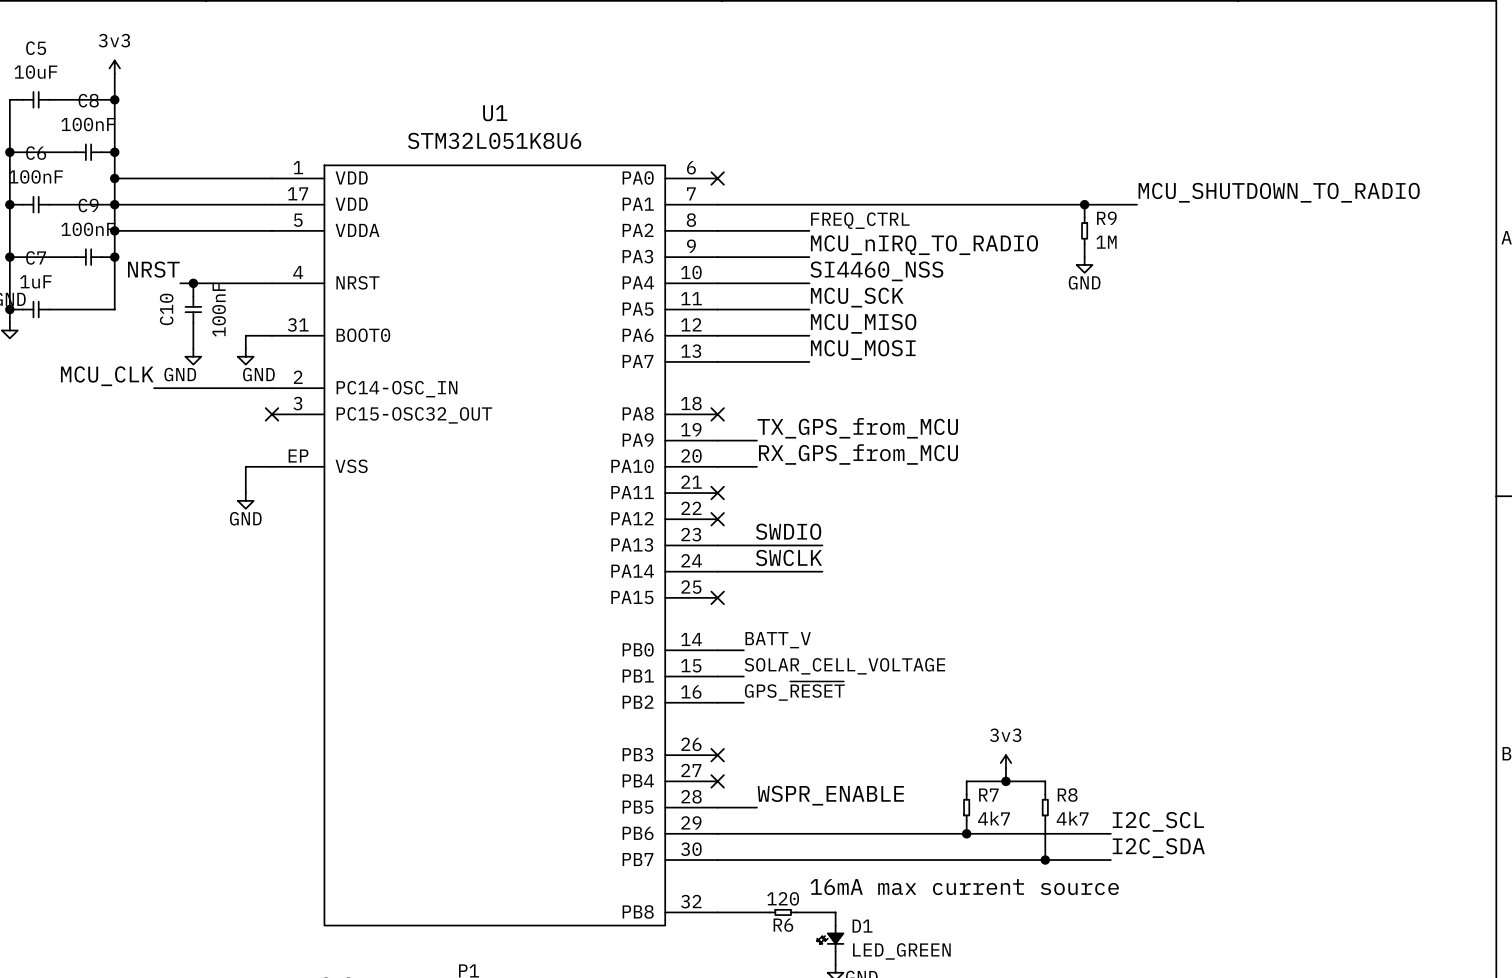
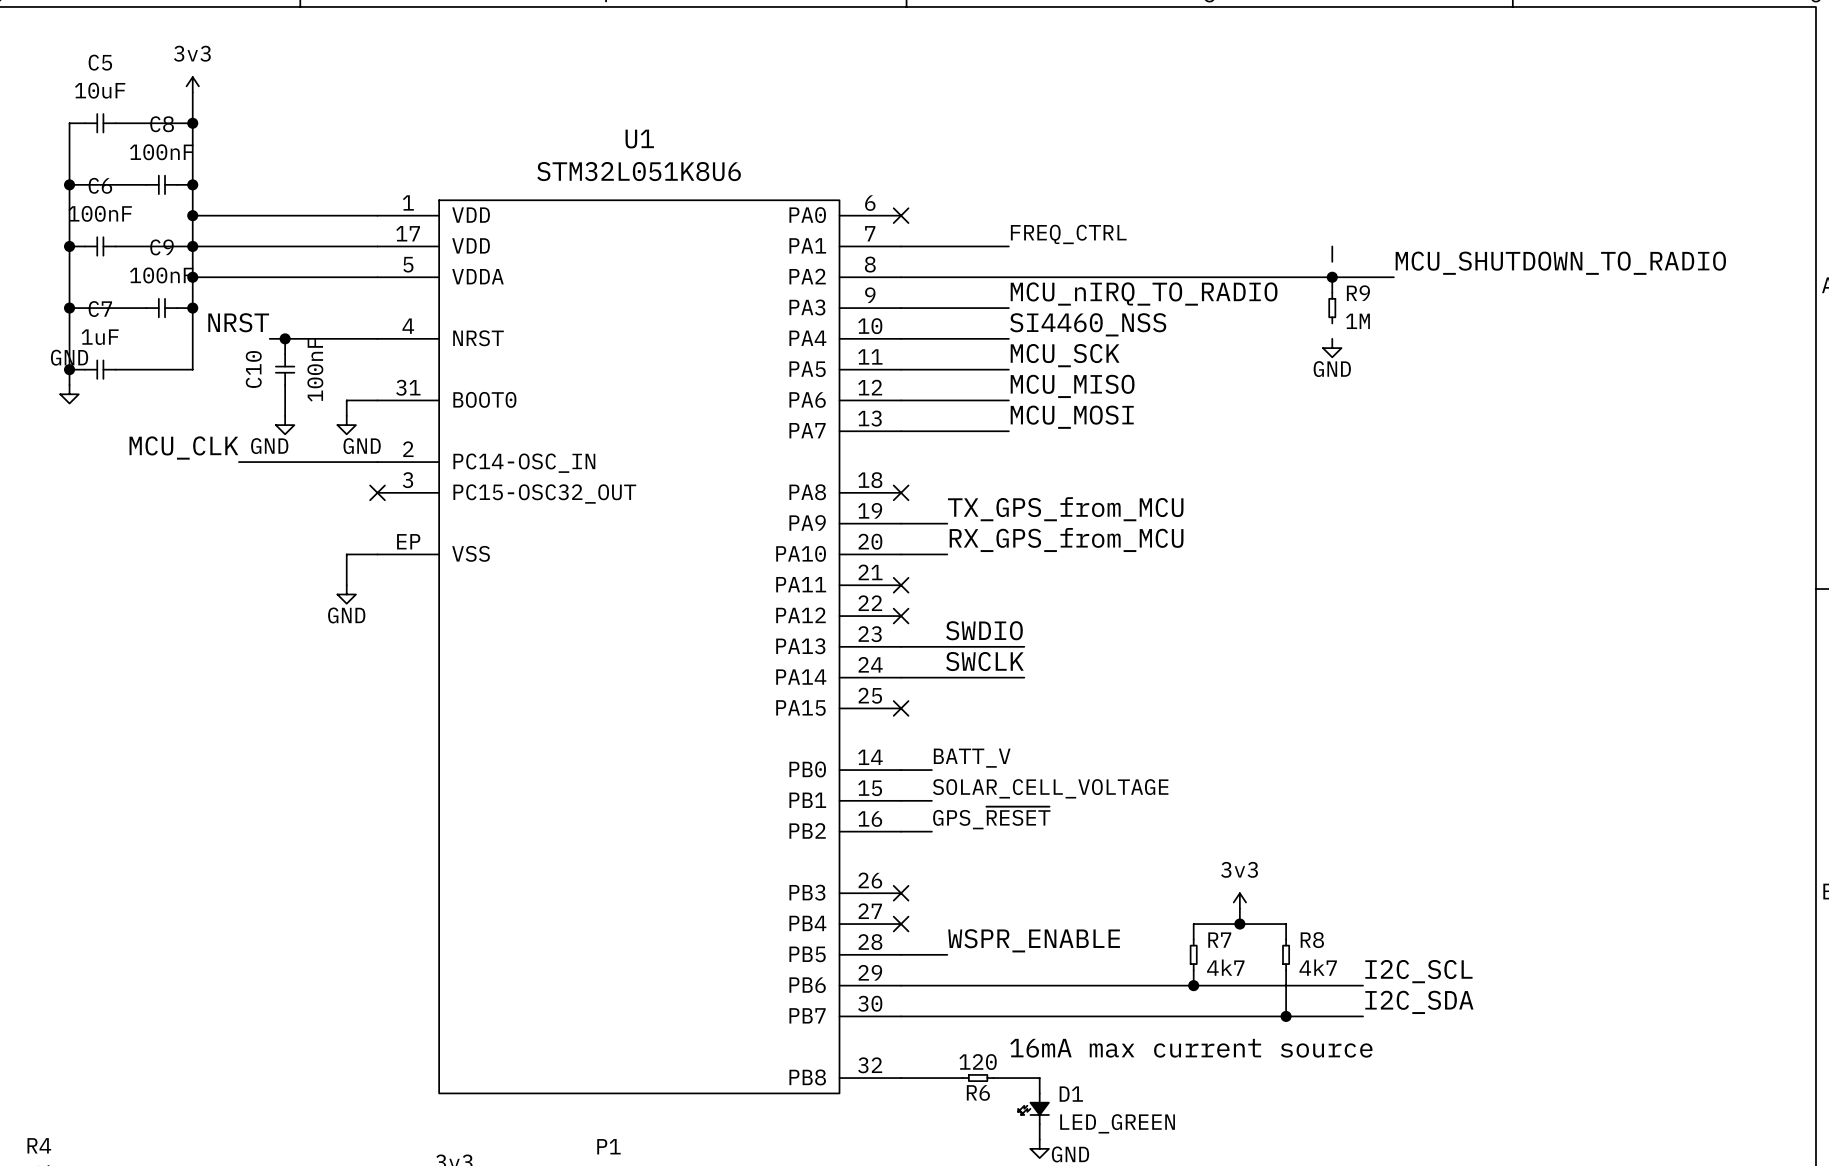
label position: MCU_SHUTDOWN_TO_RADIO (1279, 192) -> MCU_SHUTDOWN_TO_RADIO (1560, 263)
wire: (809, 204) (1137, 204) -> (1008, 277) (1393, 277)
junction position: (1084, 204) -> (1332, 277)
label position: FREQ_CTRL (860, 220) -> FREQ_CTRL (1068, 234)
R9 position: (1084, 230) -> (1332, 308)
power symbol position: GND (1084, 264) -> GND (1332, 348)

